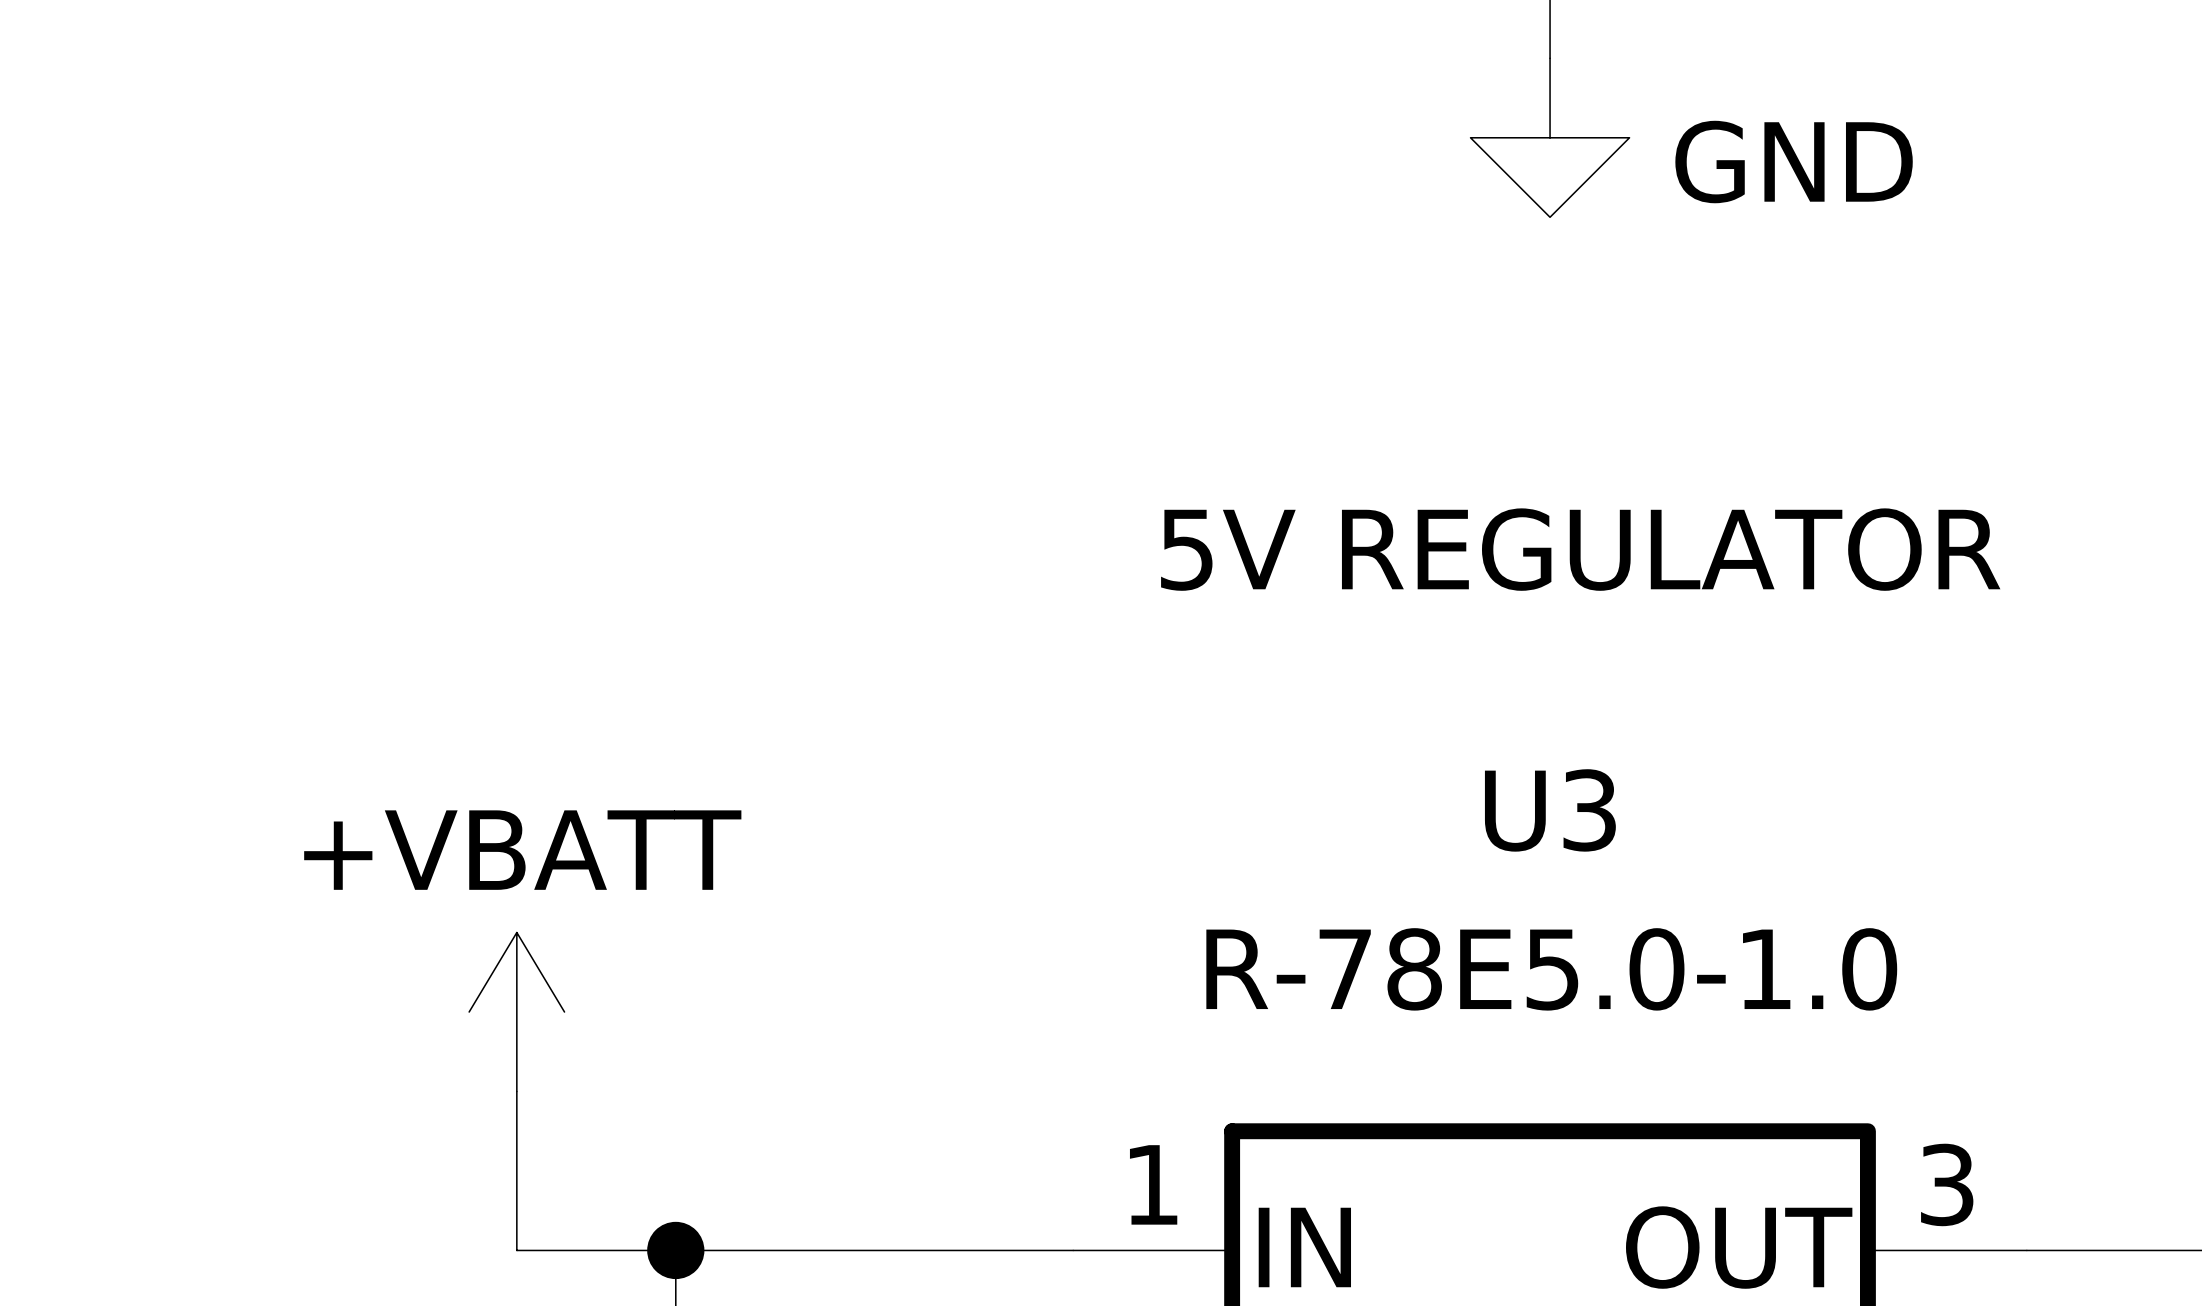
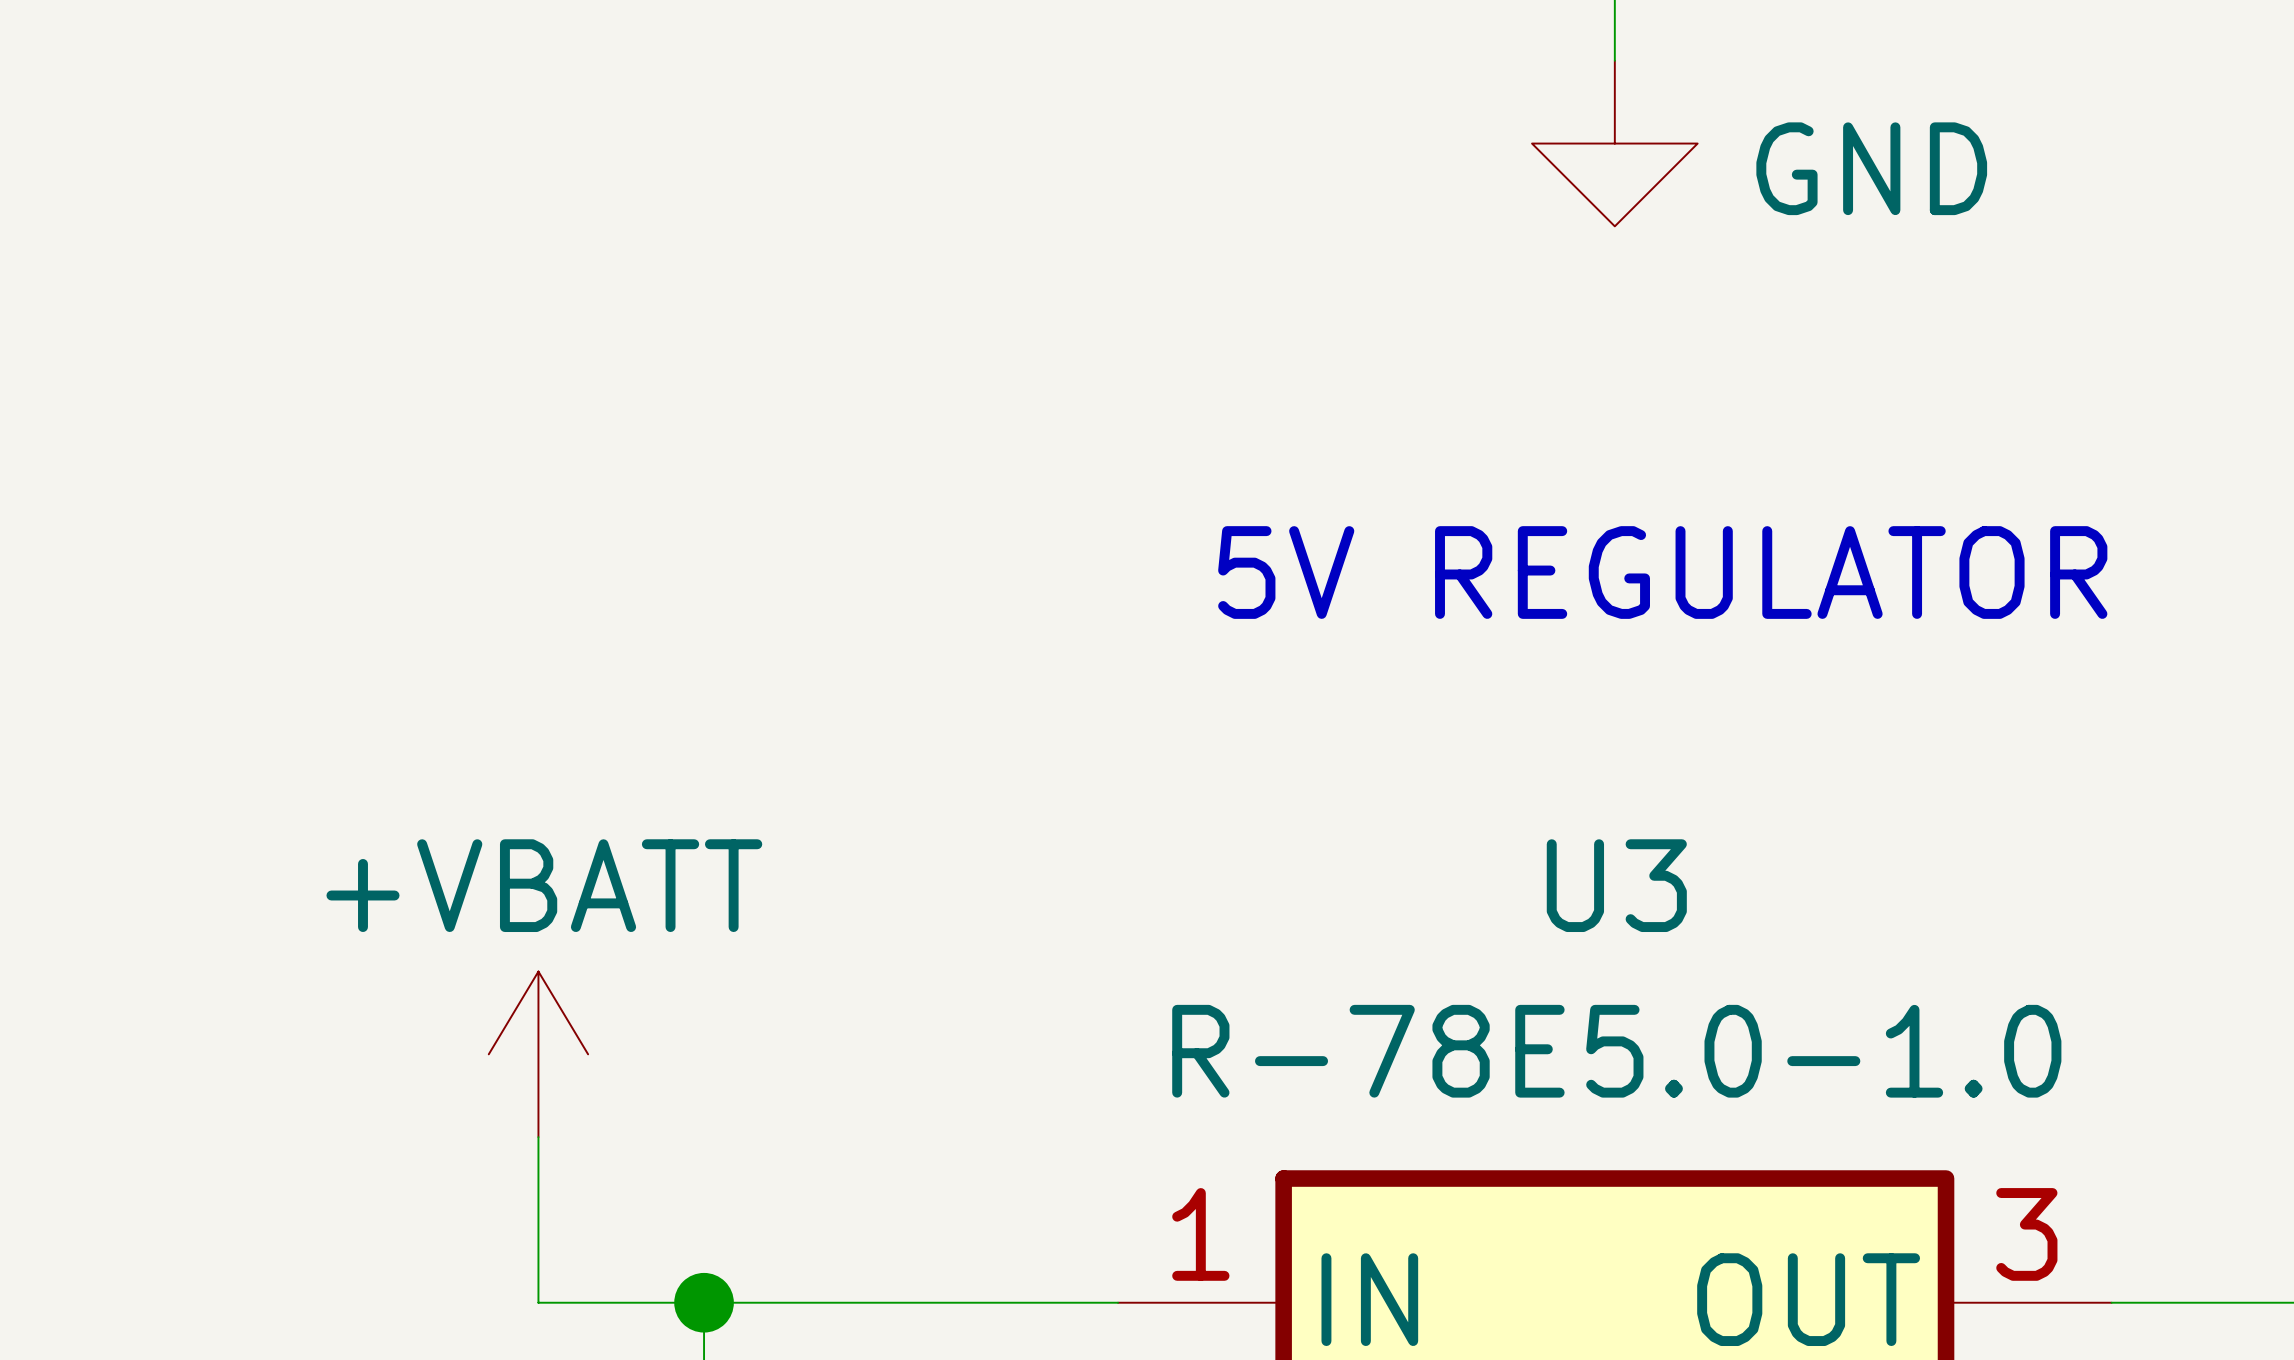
U3 name position: U3 (1550, 810) -> U3 (1616, 885)
U3 value position: R-78E5.0-1.0 (1551, 969) -> R-78E5.0-1.0 (1616, 1051)

